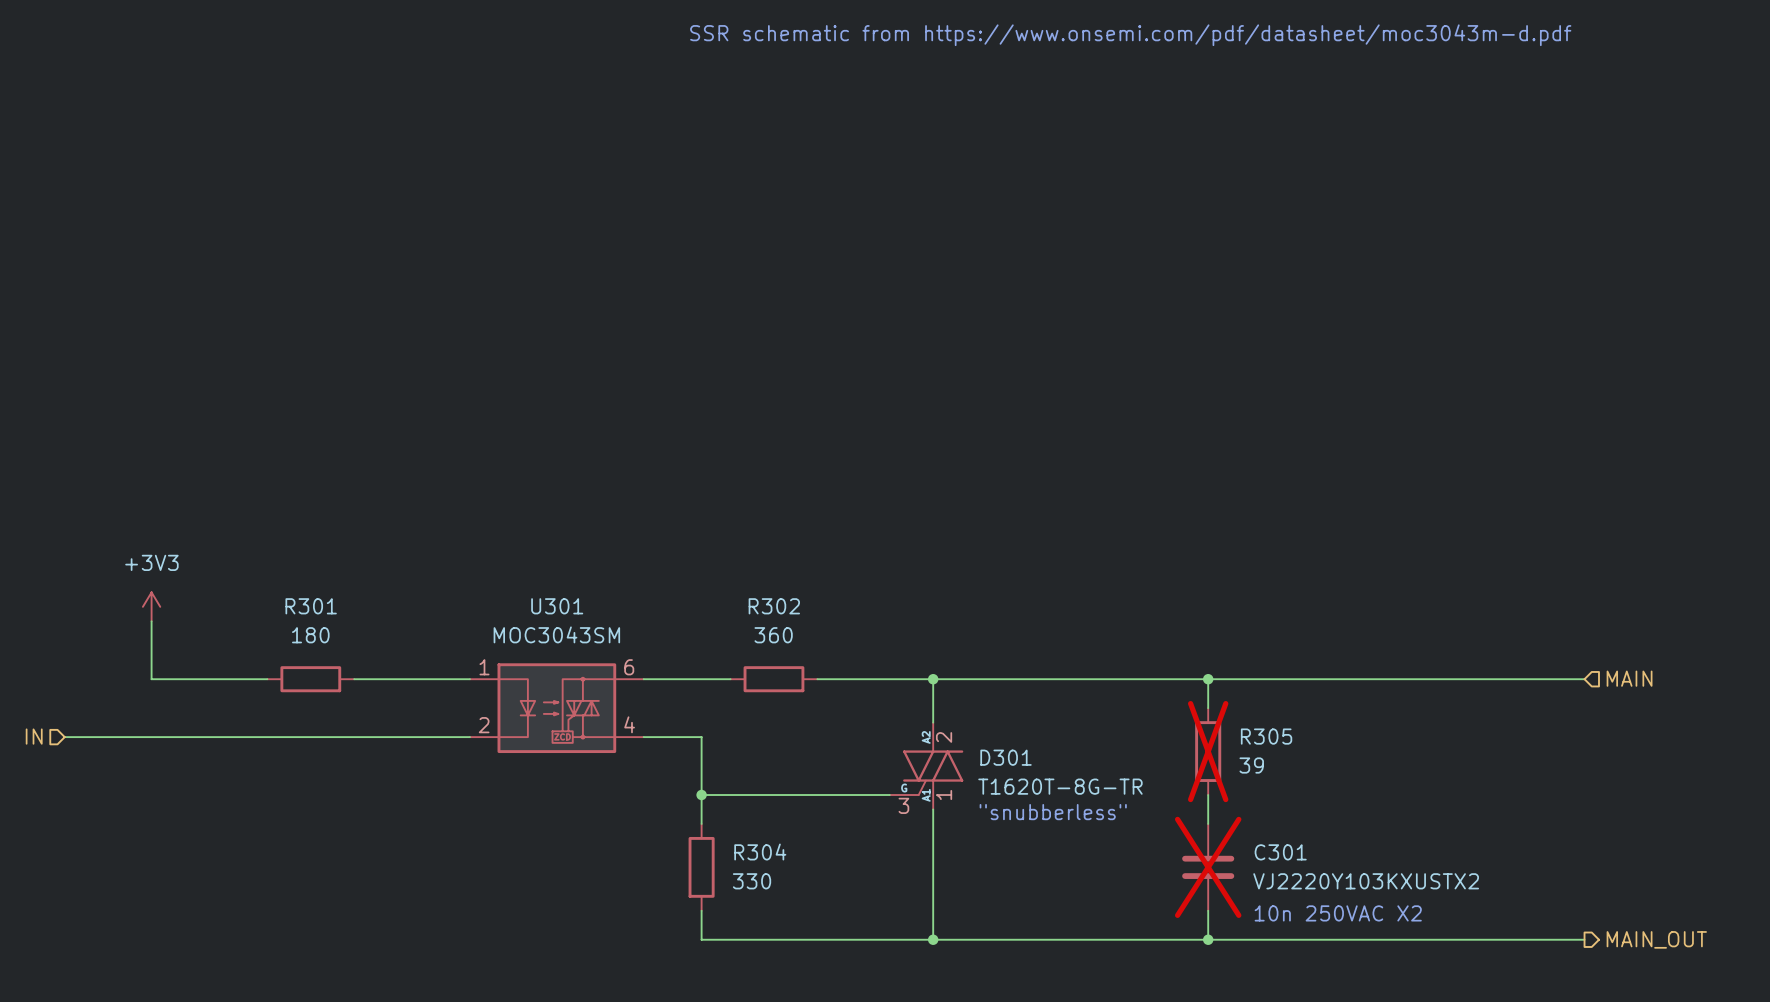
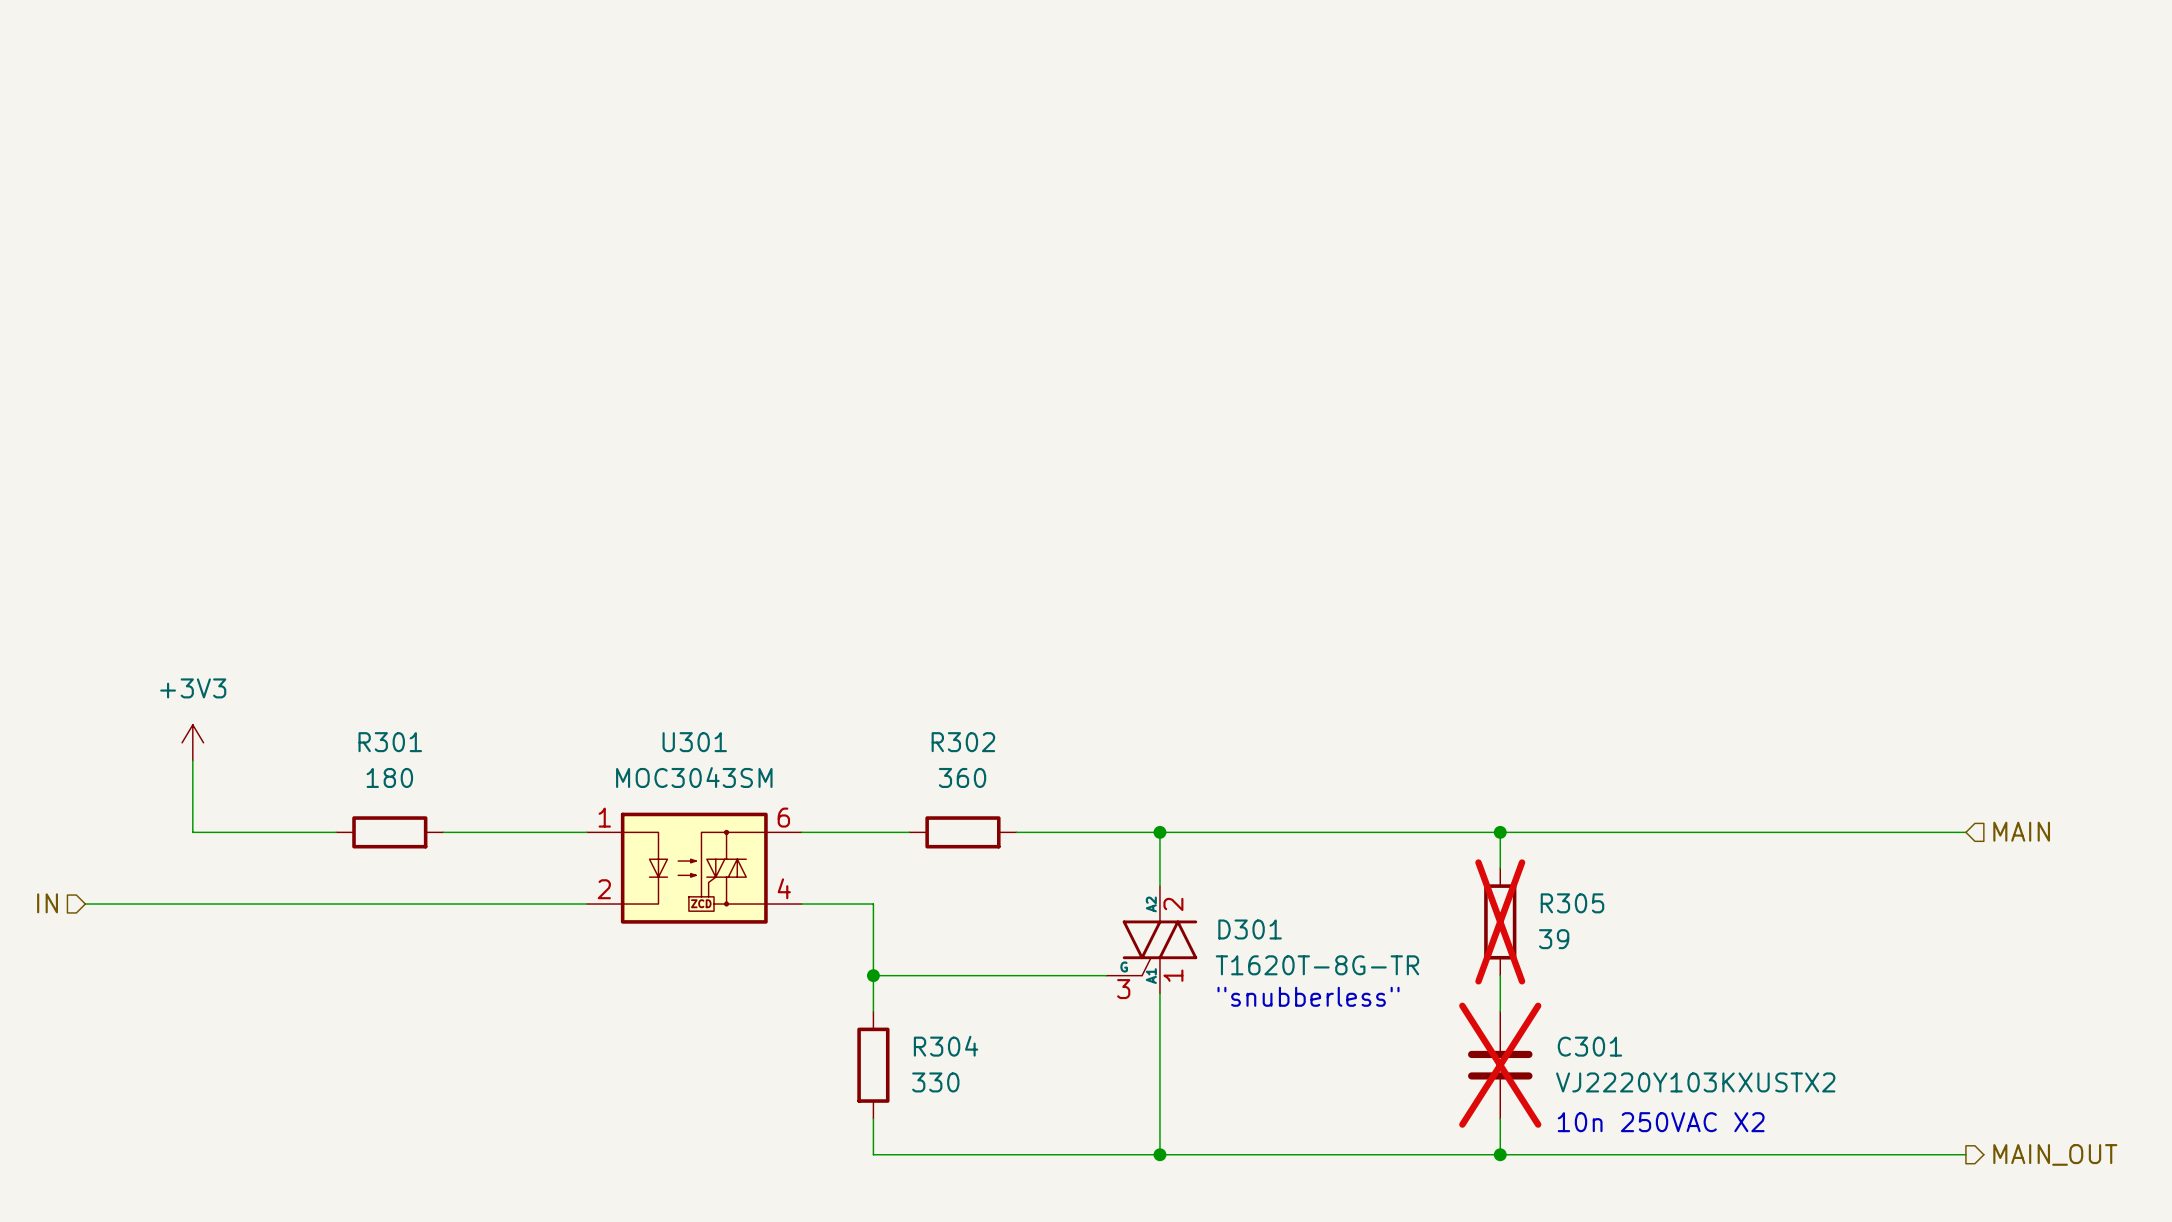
text: SSR schematic from https://www.onsemi.com/pdf/datasheet/moc3043m-d.pdf (1130, 35) -> none

